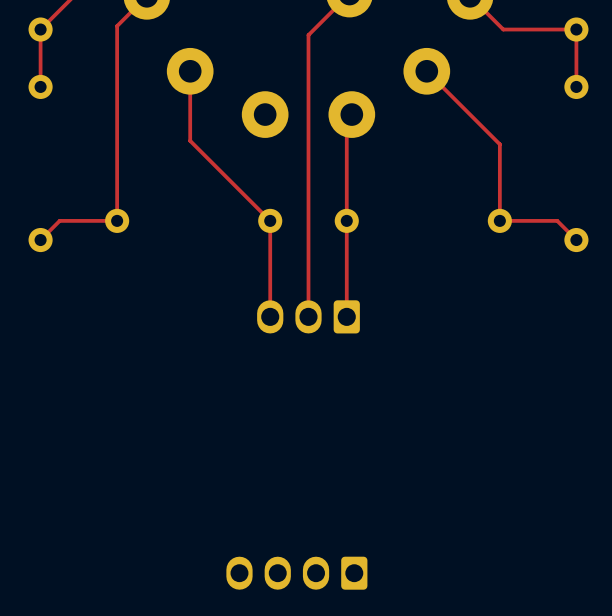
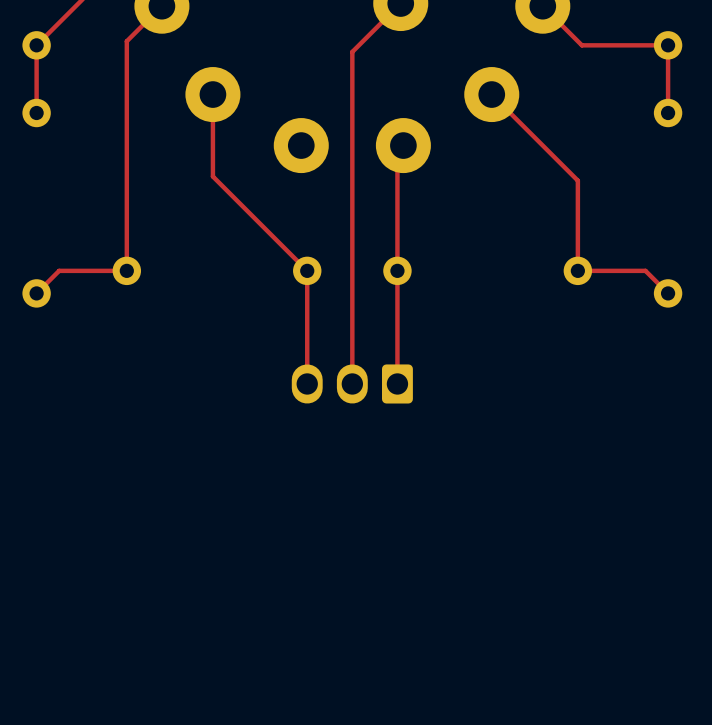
part: (296, 573) -> none

